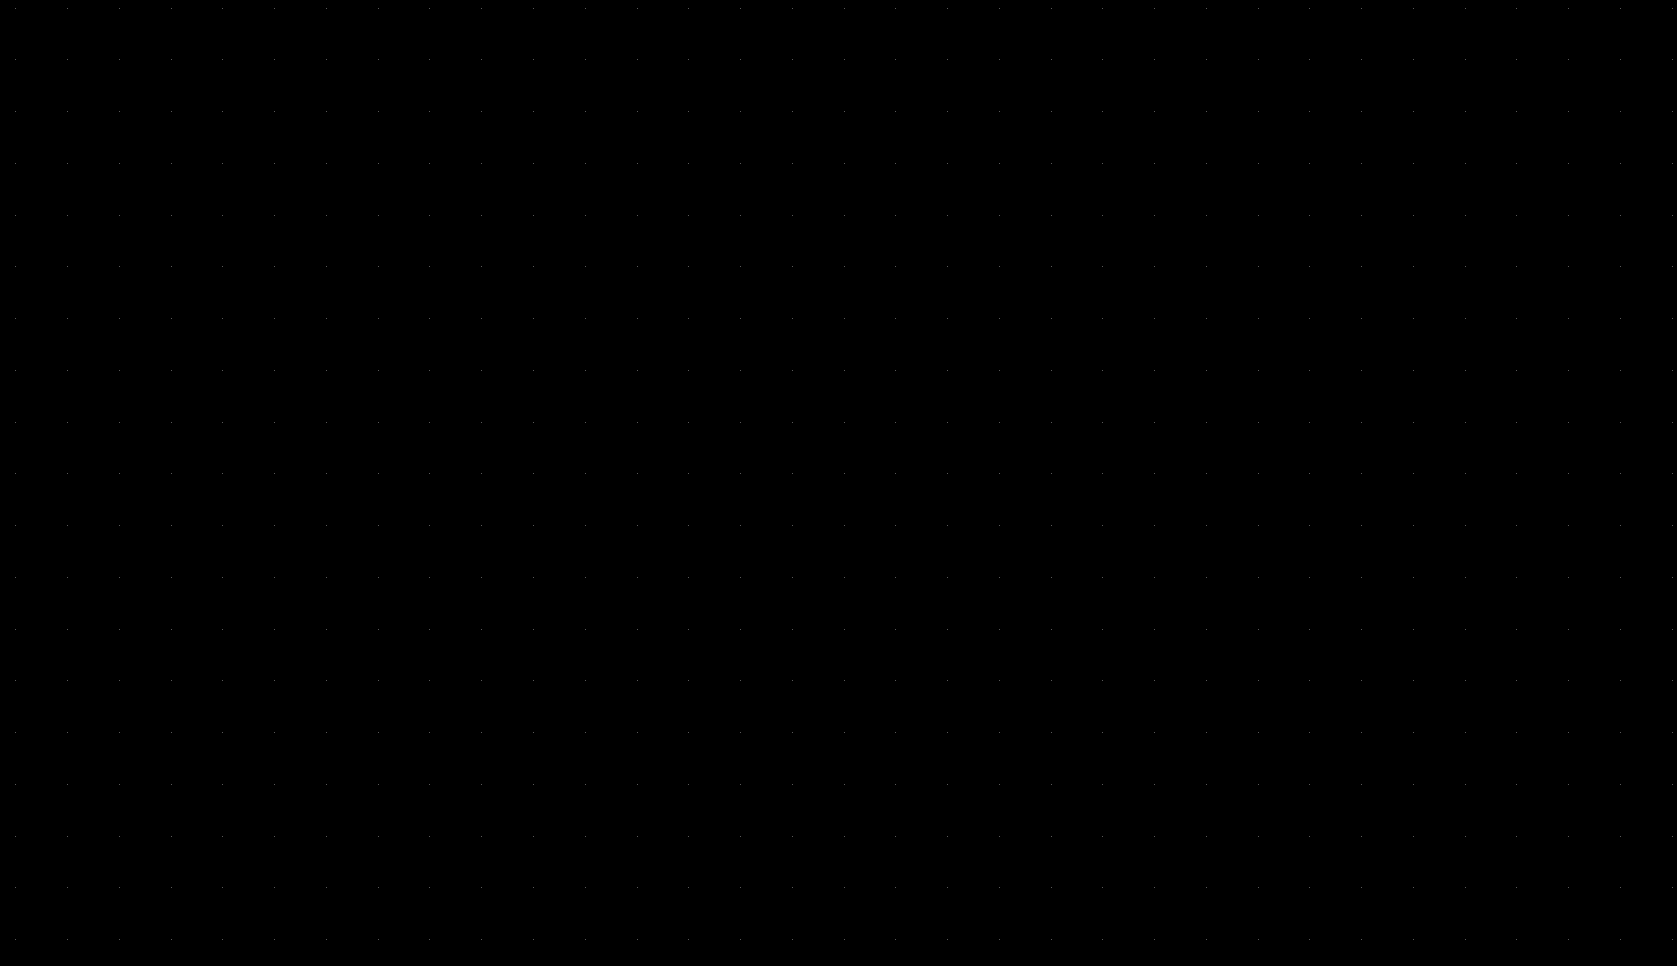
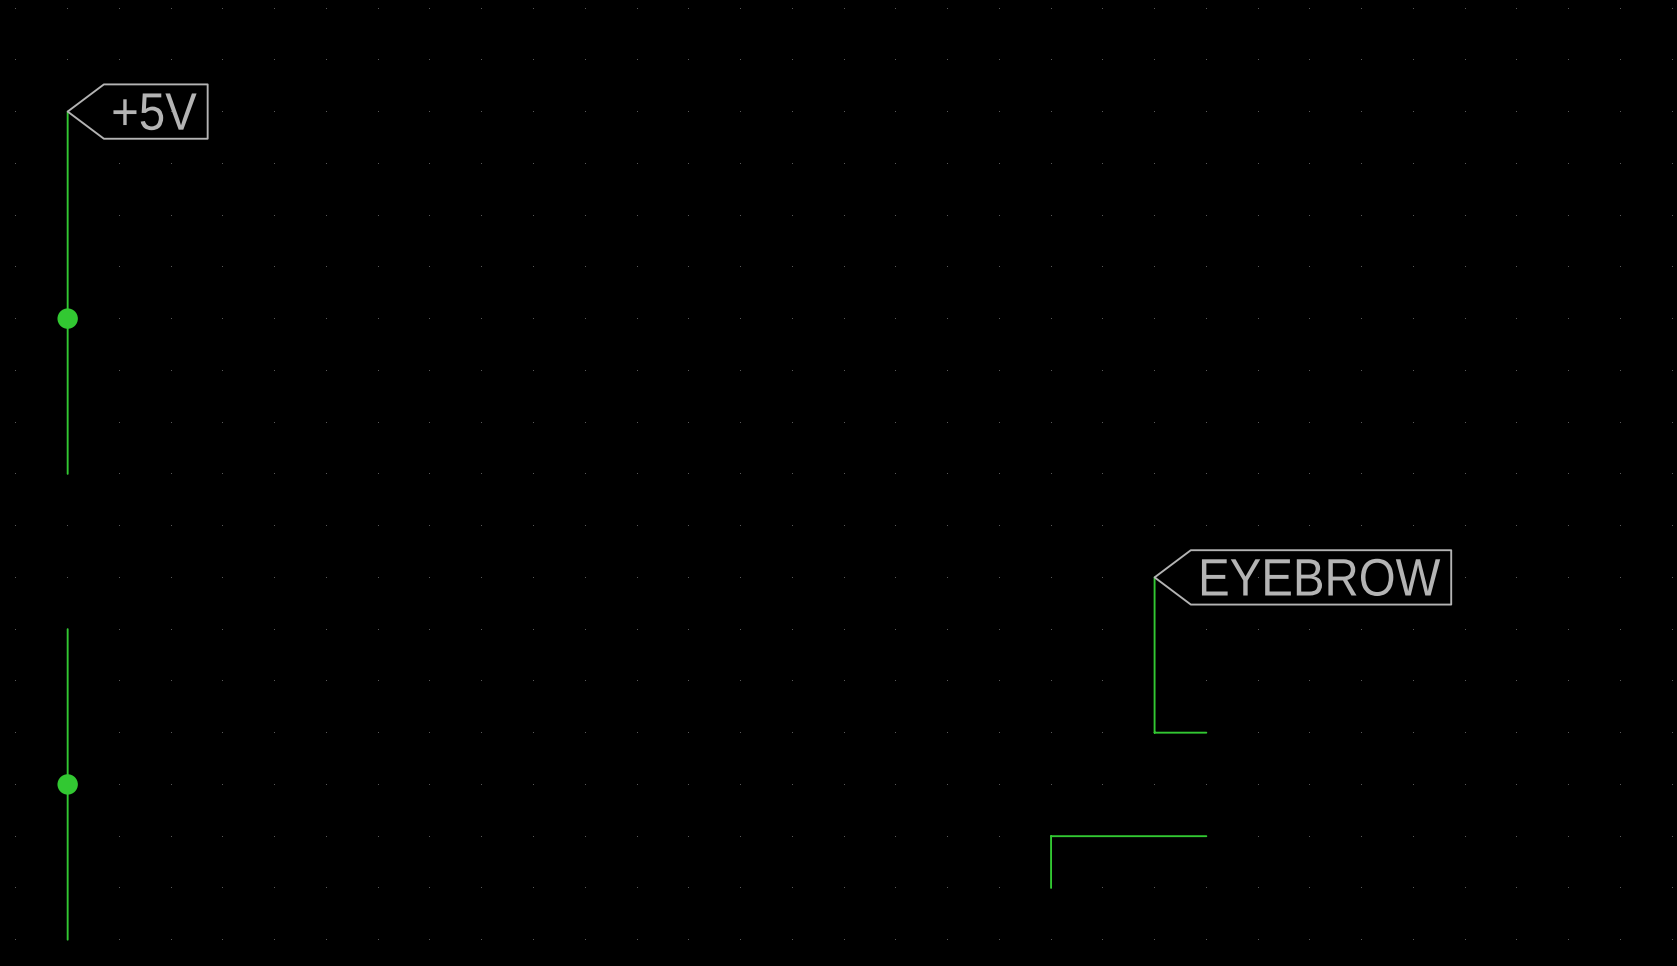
wire: none -> (67, 111) (67, 473)
global label: none -> +5V (155, 111)
junction: none -> (67, 318)
wire: none -> (1154, 577) (1154, 732) (1206, 732)
global label: none -> EYEBROW (1321, 577)
wire: none -> (67, 629) (67, 939)
junction: none -> (67, 784)
wire: none -> (1206, 836) (1051, 836) (1051, 887)

